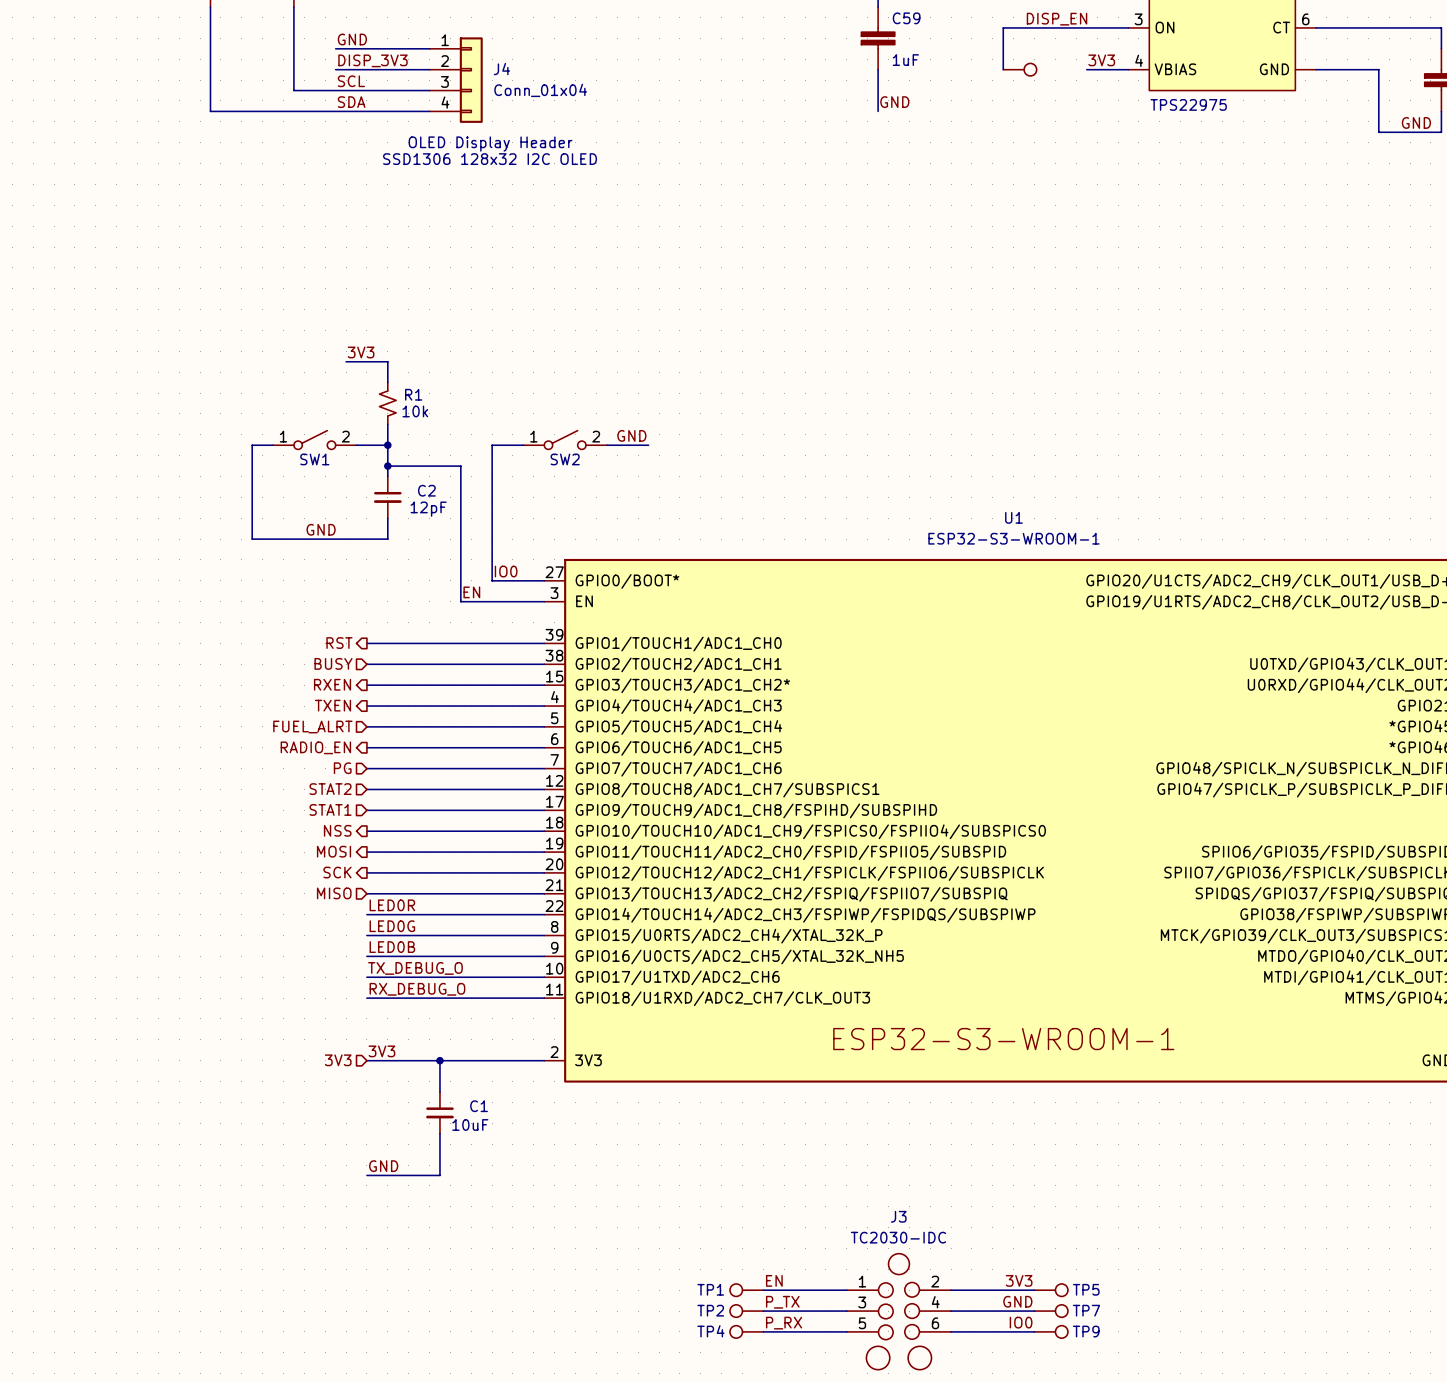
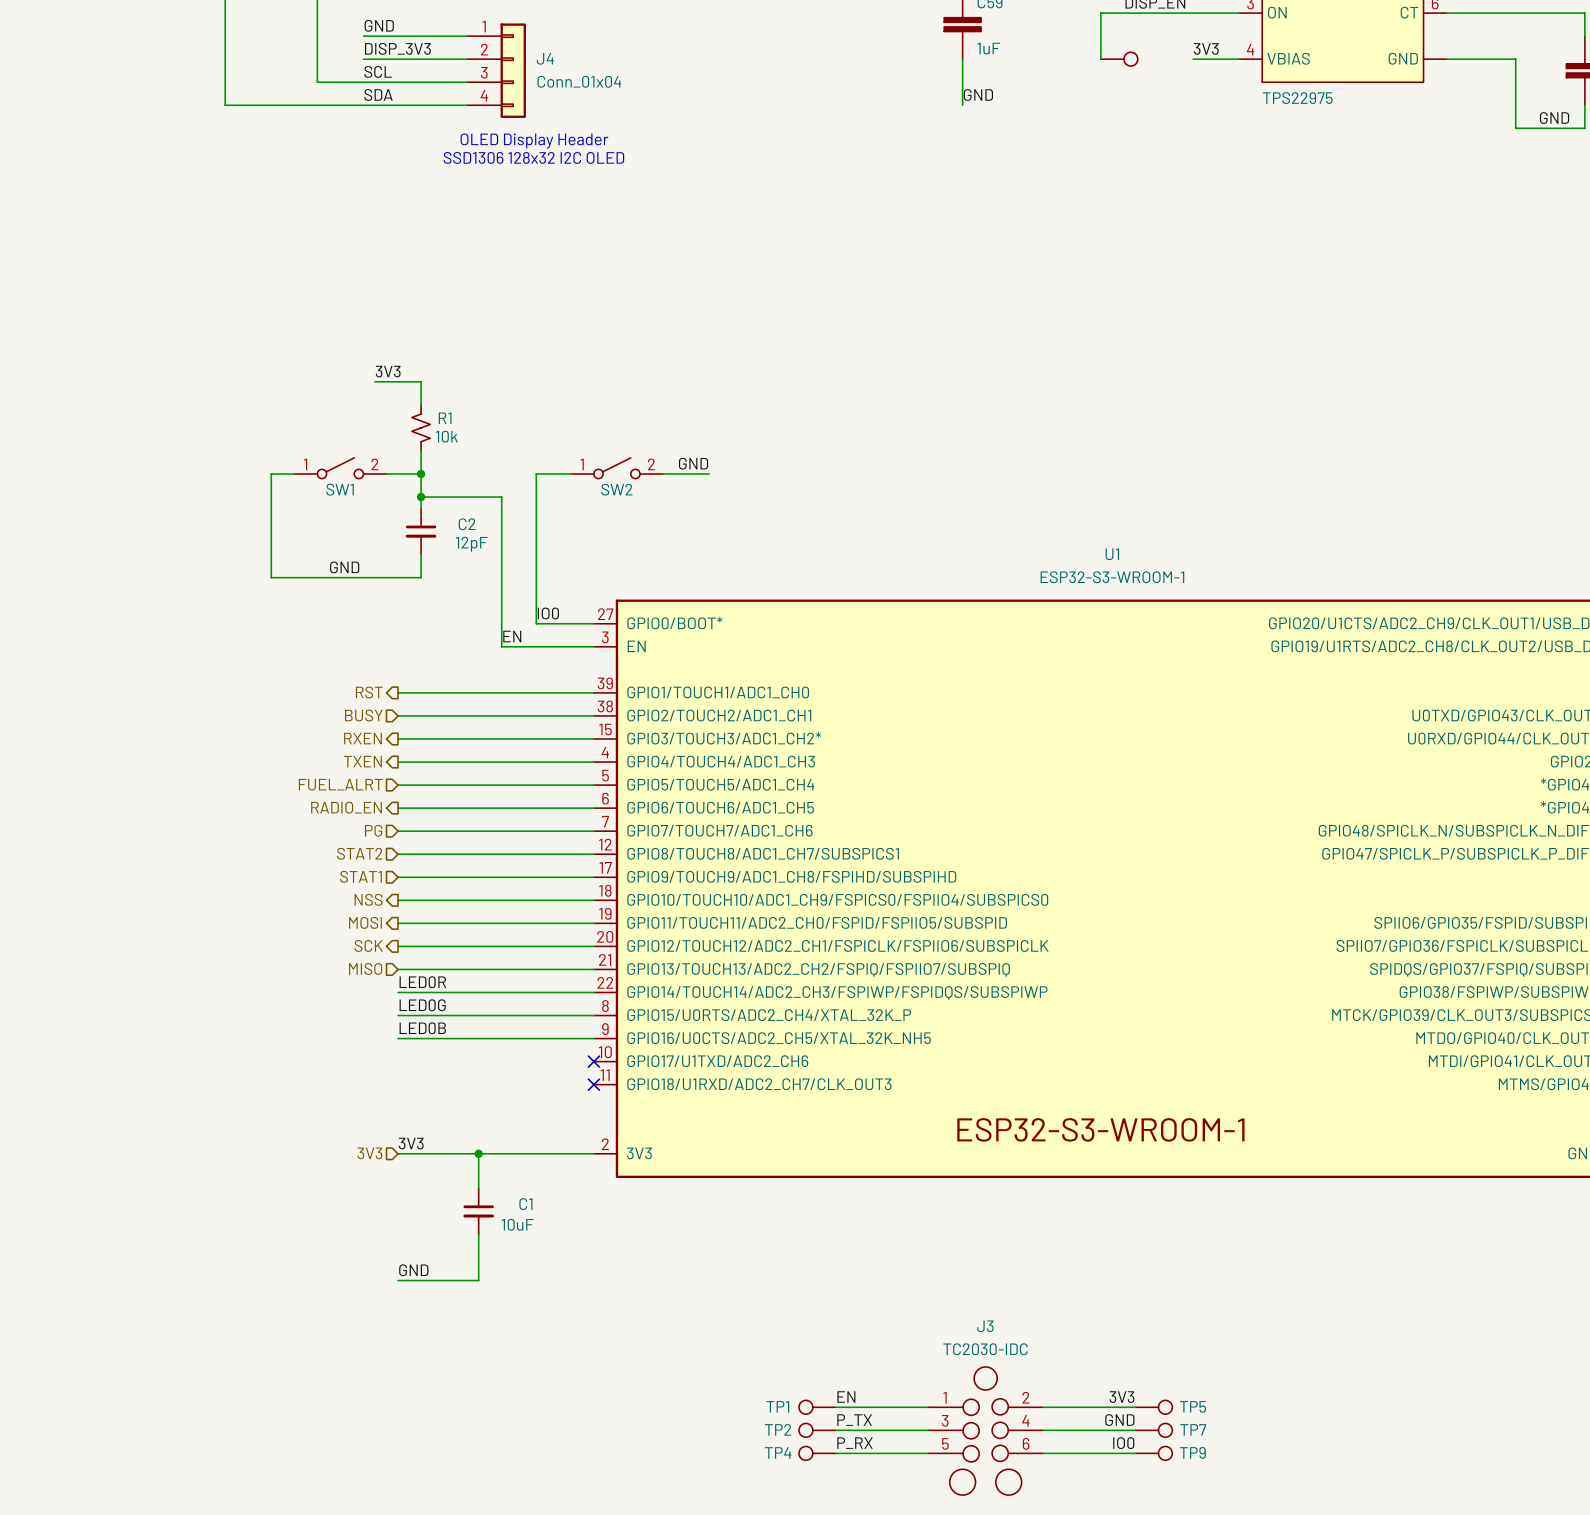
label: TX_DEBUG_O (415, 968) -> none
wire: (366, 977) (544, 977) -> none
no-connect mark: none -> (593, 1061)
label: RX_DEBUG_O (417, 989) -> none
wire: (366, 998) (544, 998) -> none
no-connect mark: none -> (593, 1084)

